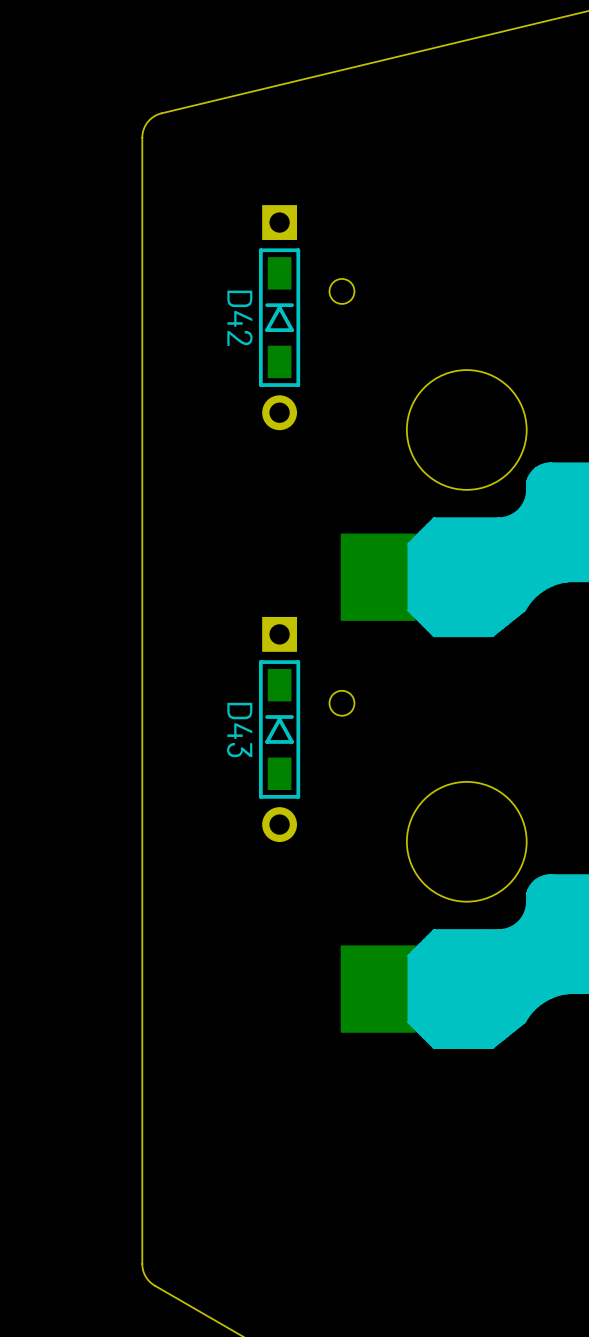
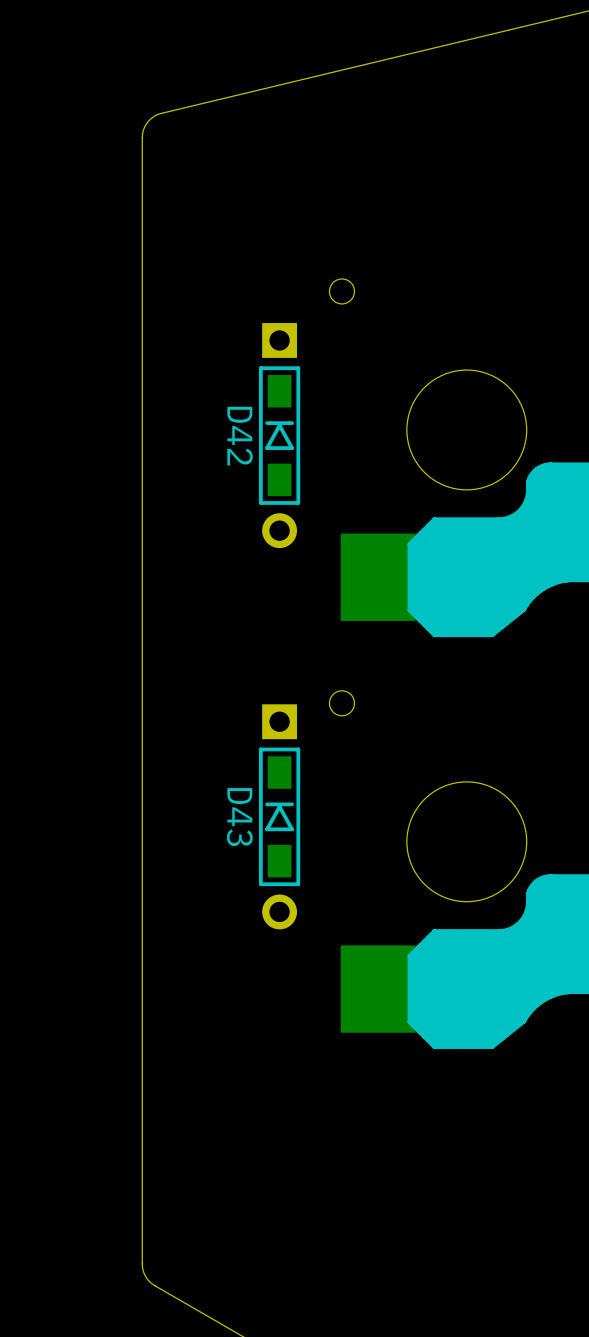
D42 position: (279, 317) -> (279, 435)
D43 position: (279, 729) -> (279, 816)

